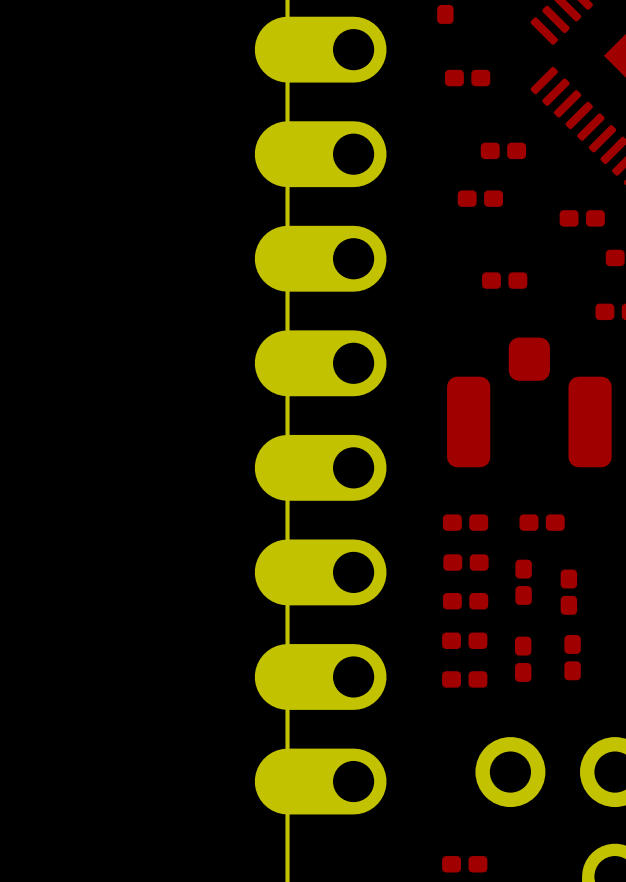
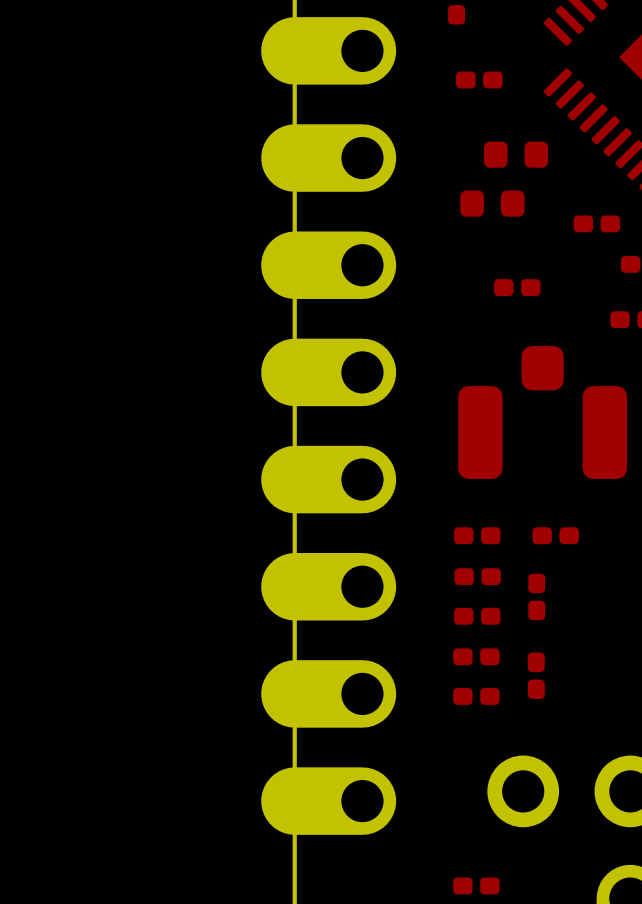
part footprint: [480, 142, 527, 160] -> [483, 141, 549, 168]
part footprint: [457, 190, 504, 207] -> [460, 190, 525, 217]
part: (568, 592) -> none
part: (572, 657) -> none

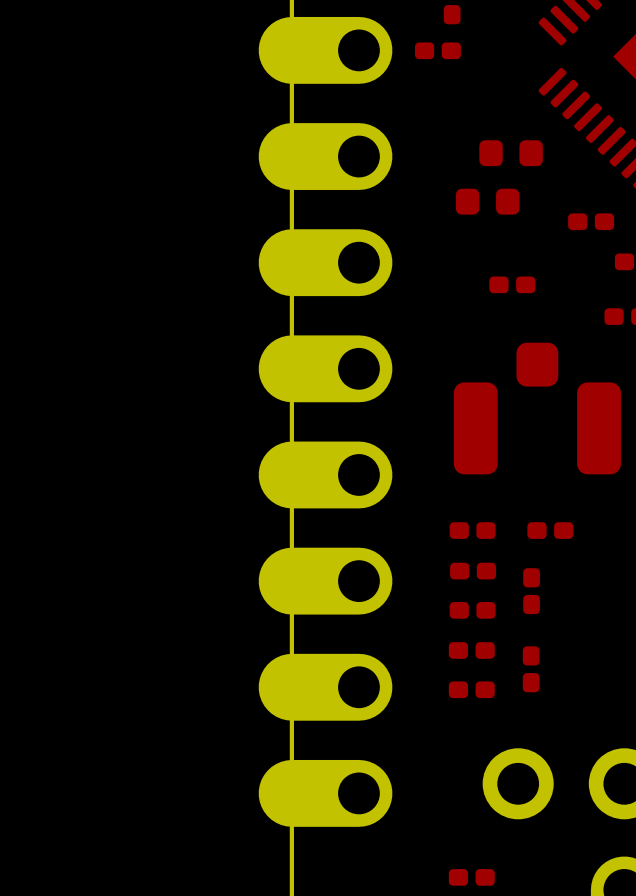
part position: (479, 79) -> (437, 50)

